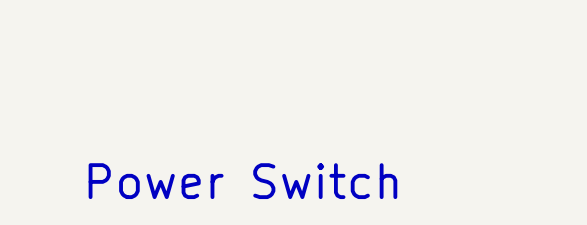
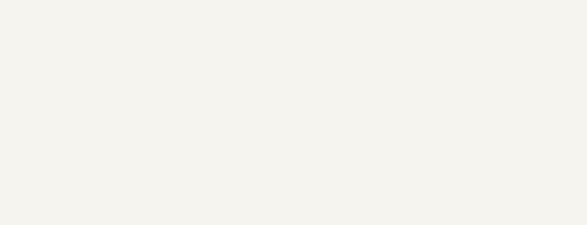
text: Power Switch (242, 181) -> none

